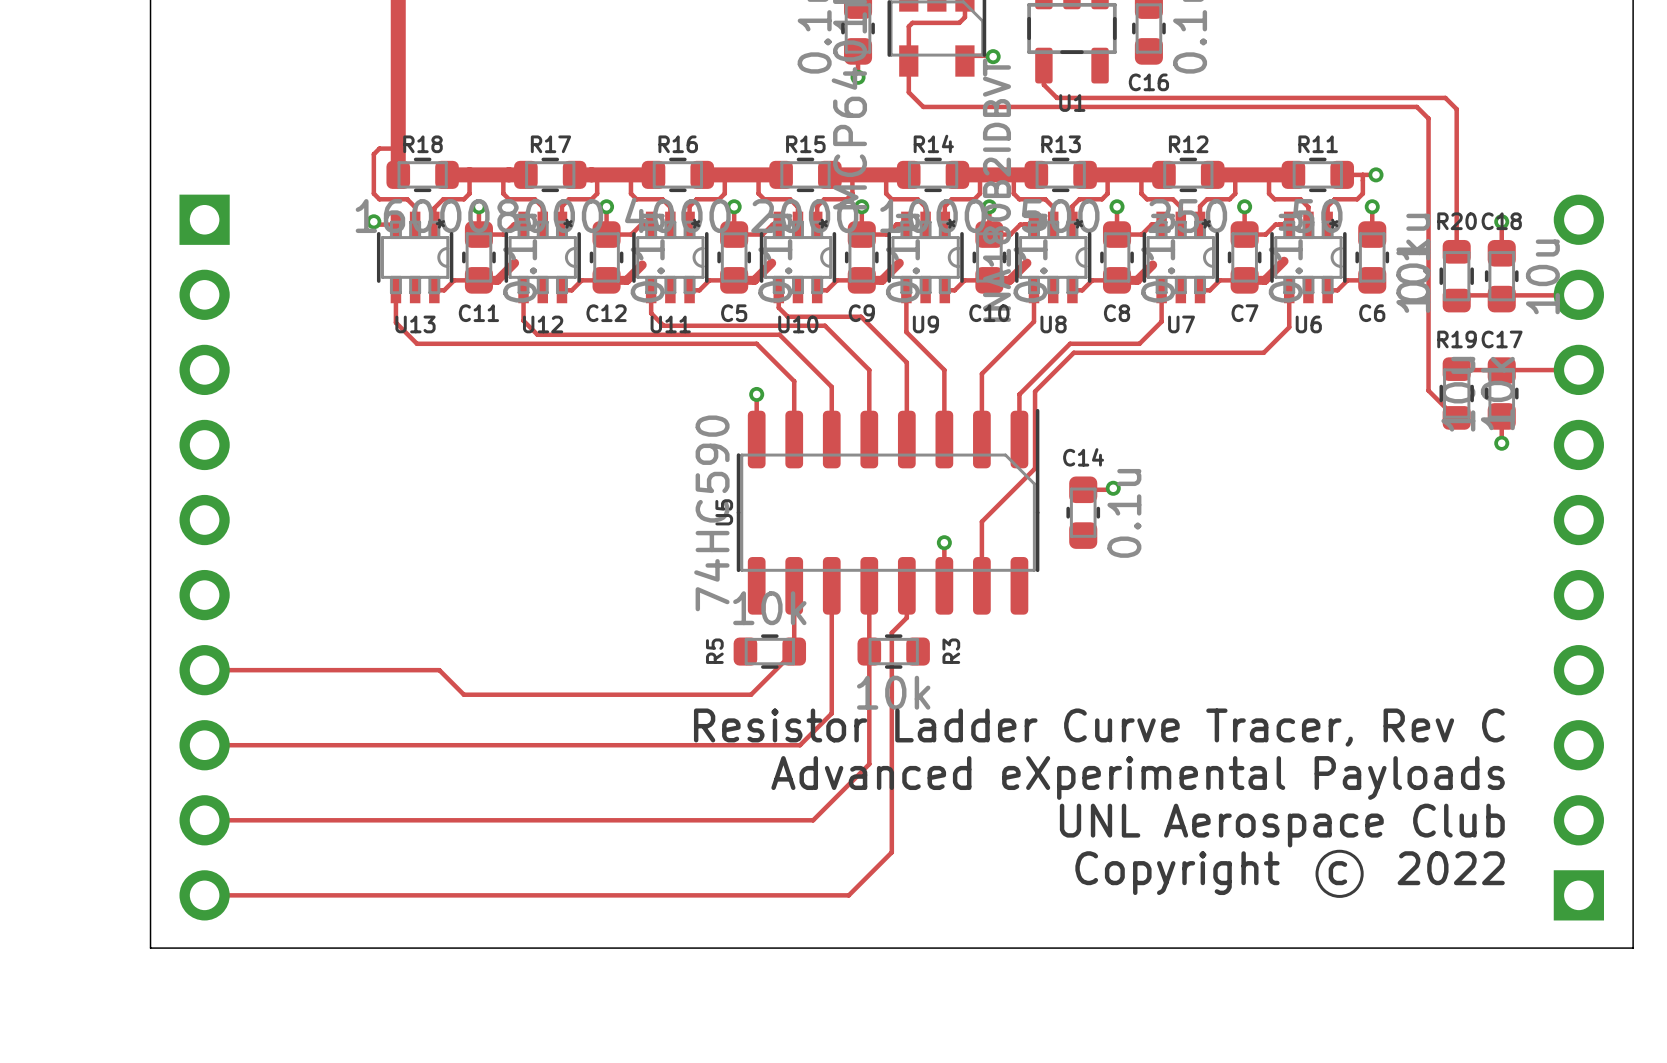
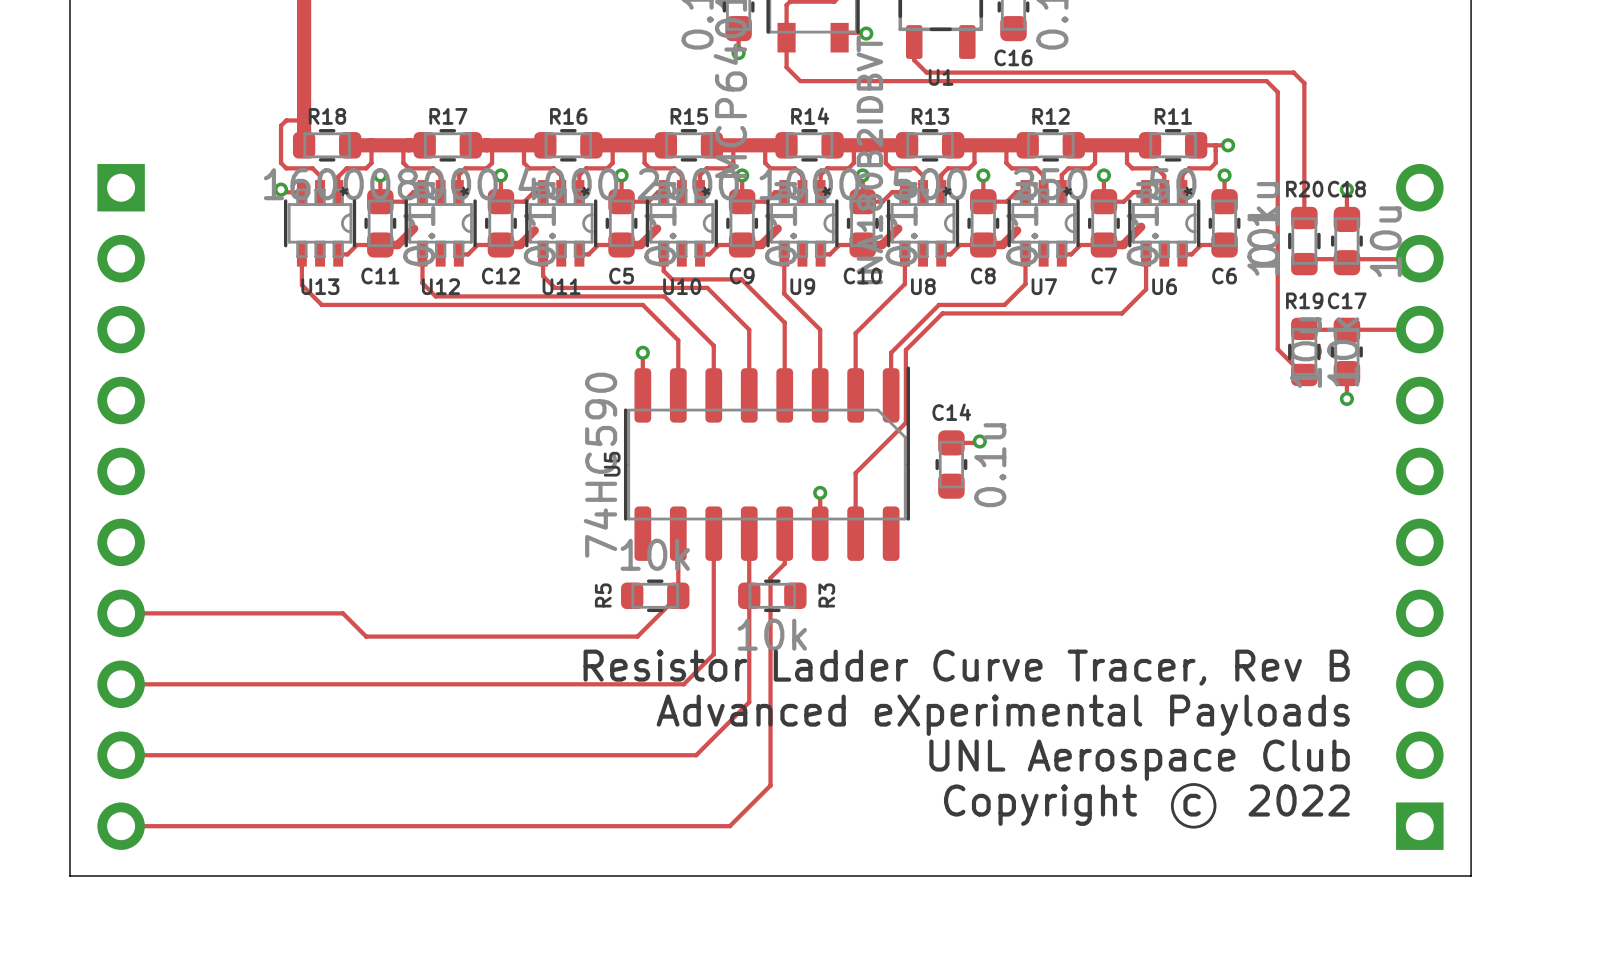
text: Resistor Ladder Curve Tracer, Rev C (1099, 727) -> Resistor Ladder Curve Tracer, Rev B (966, 667)

